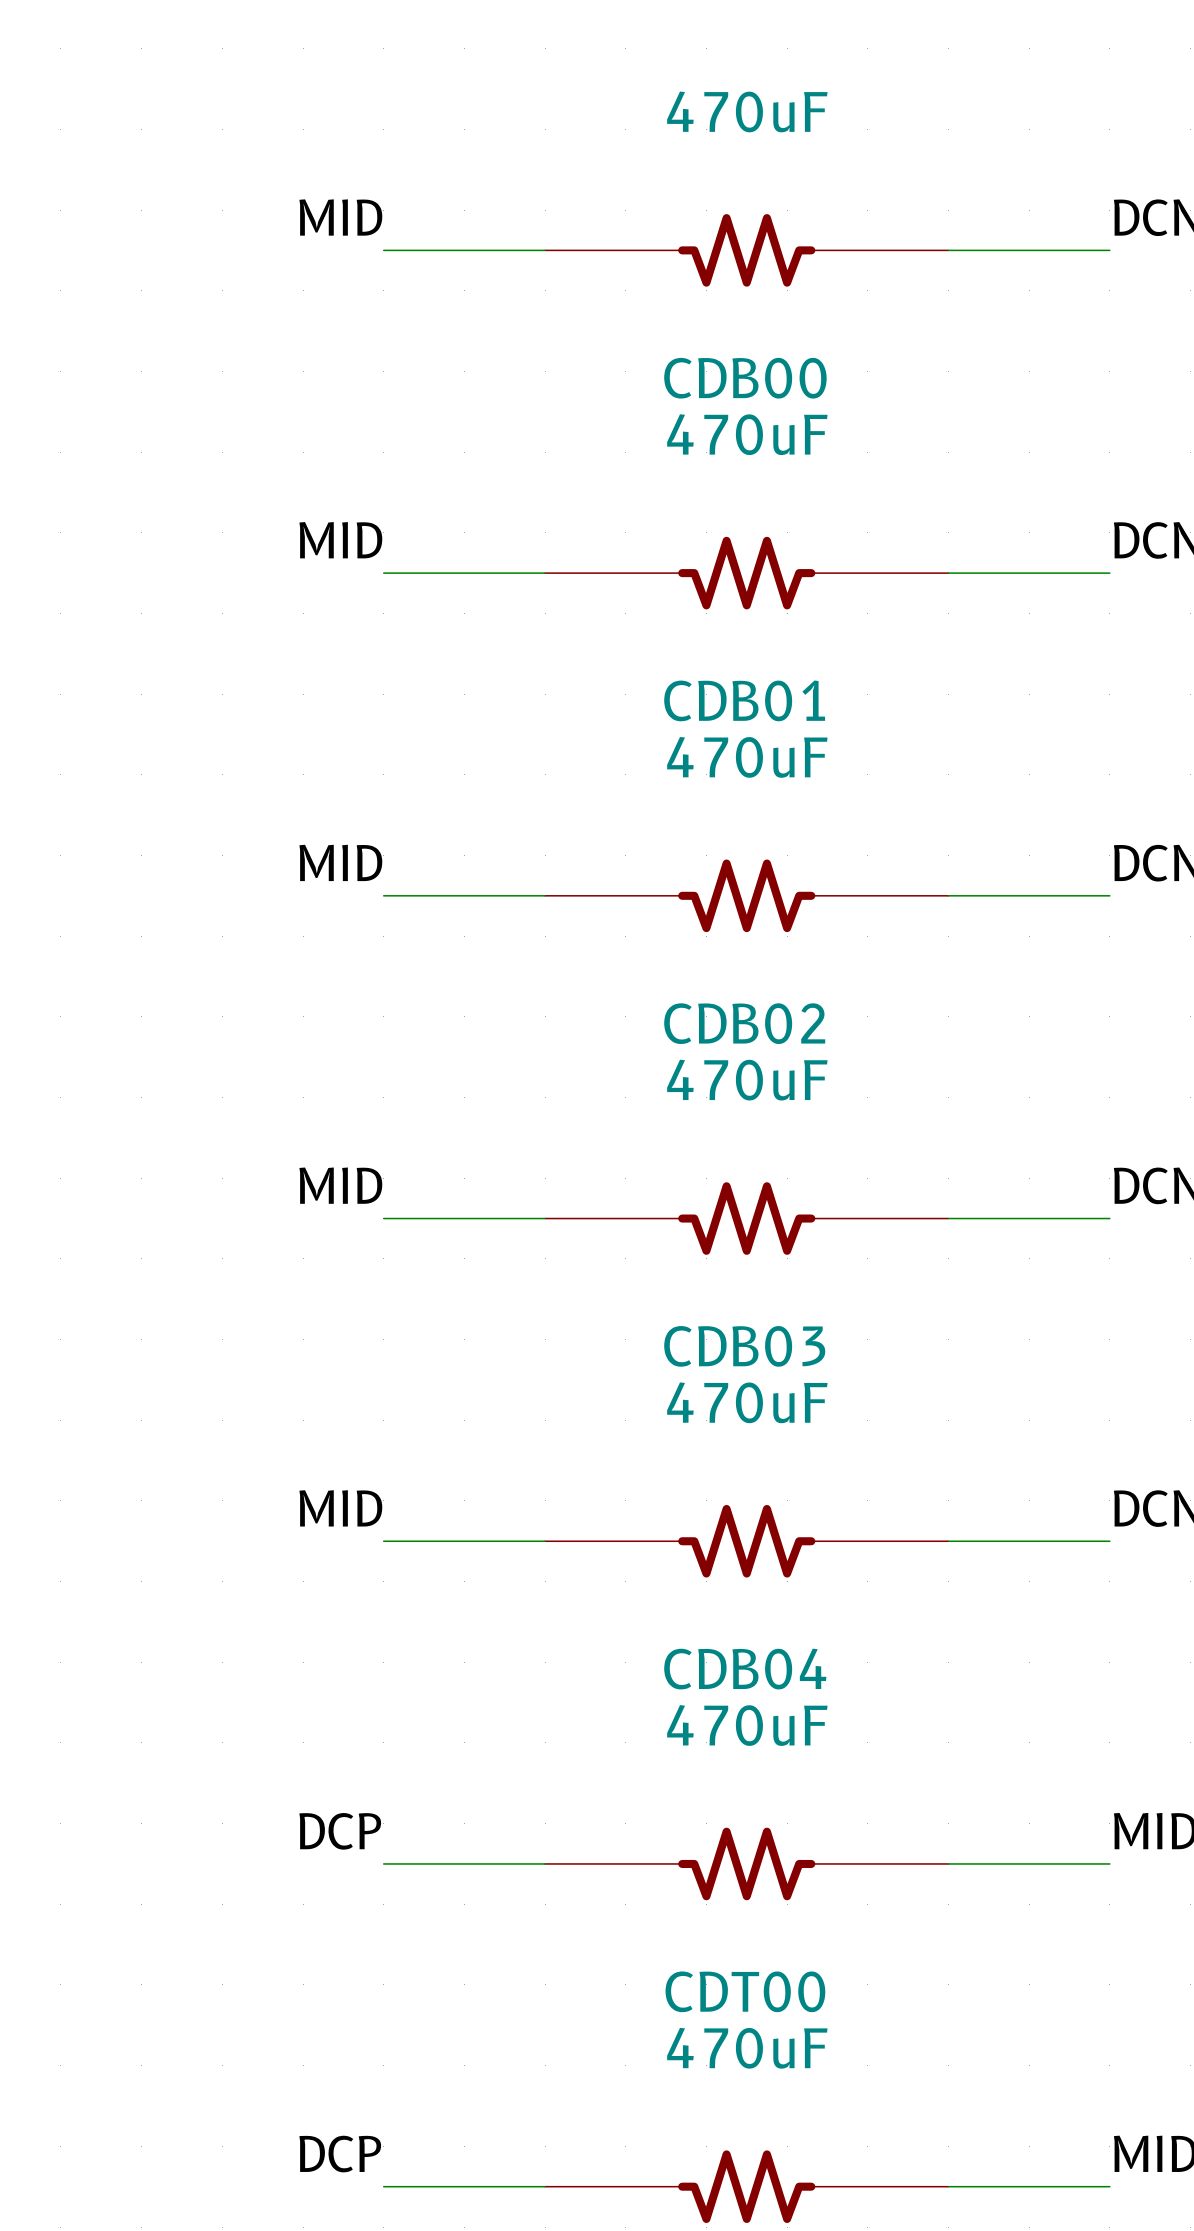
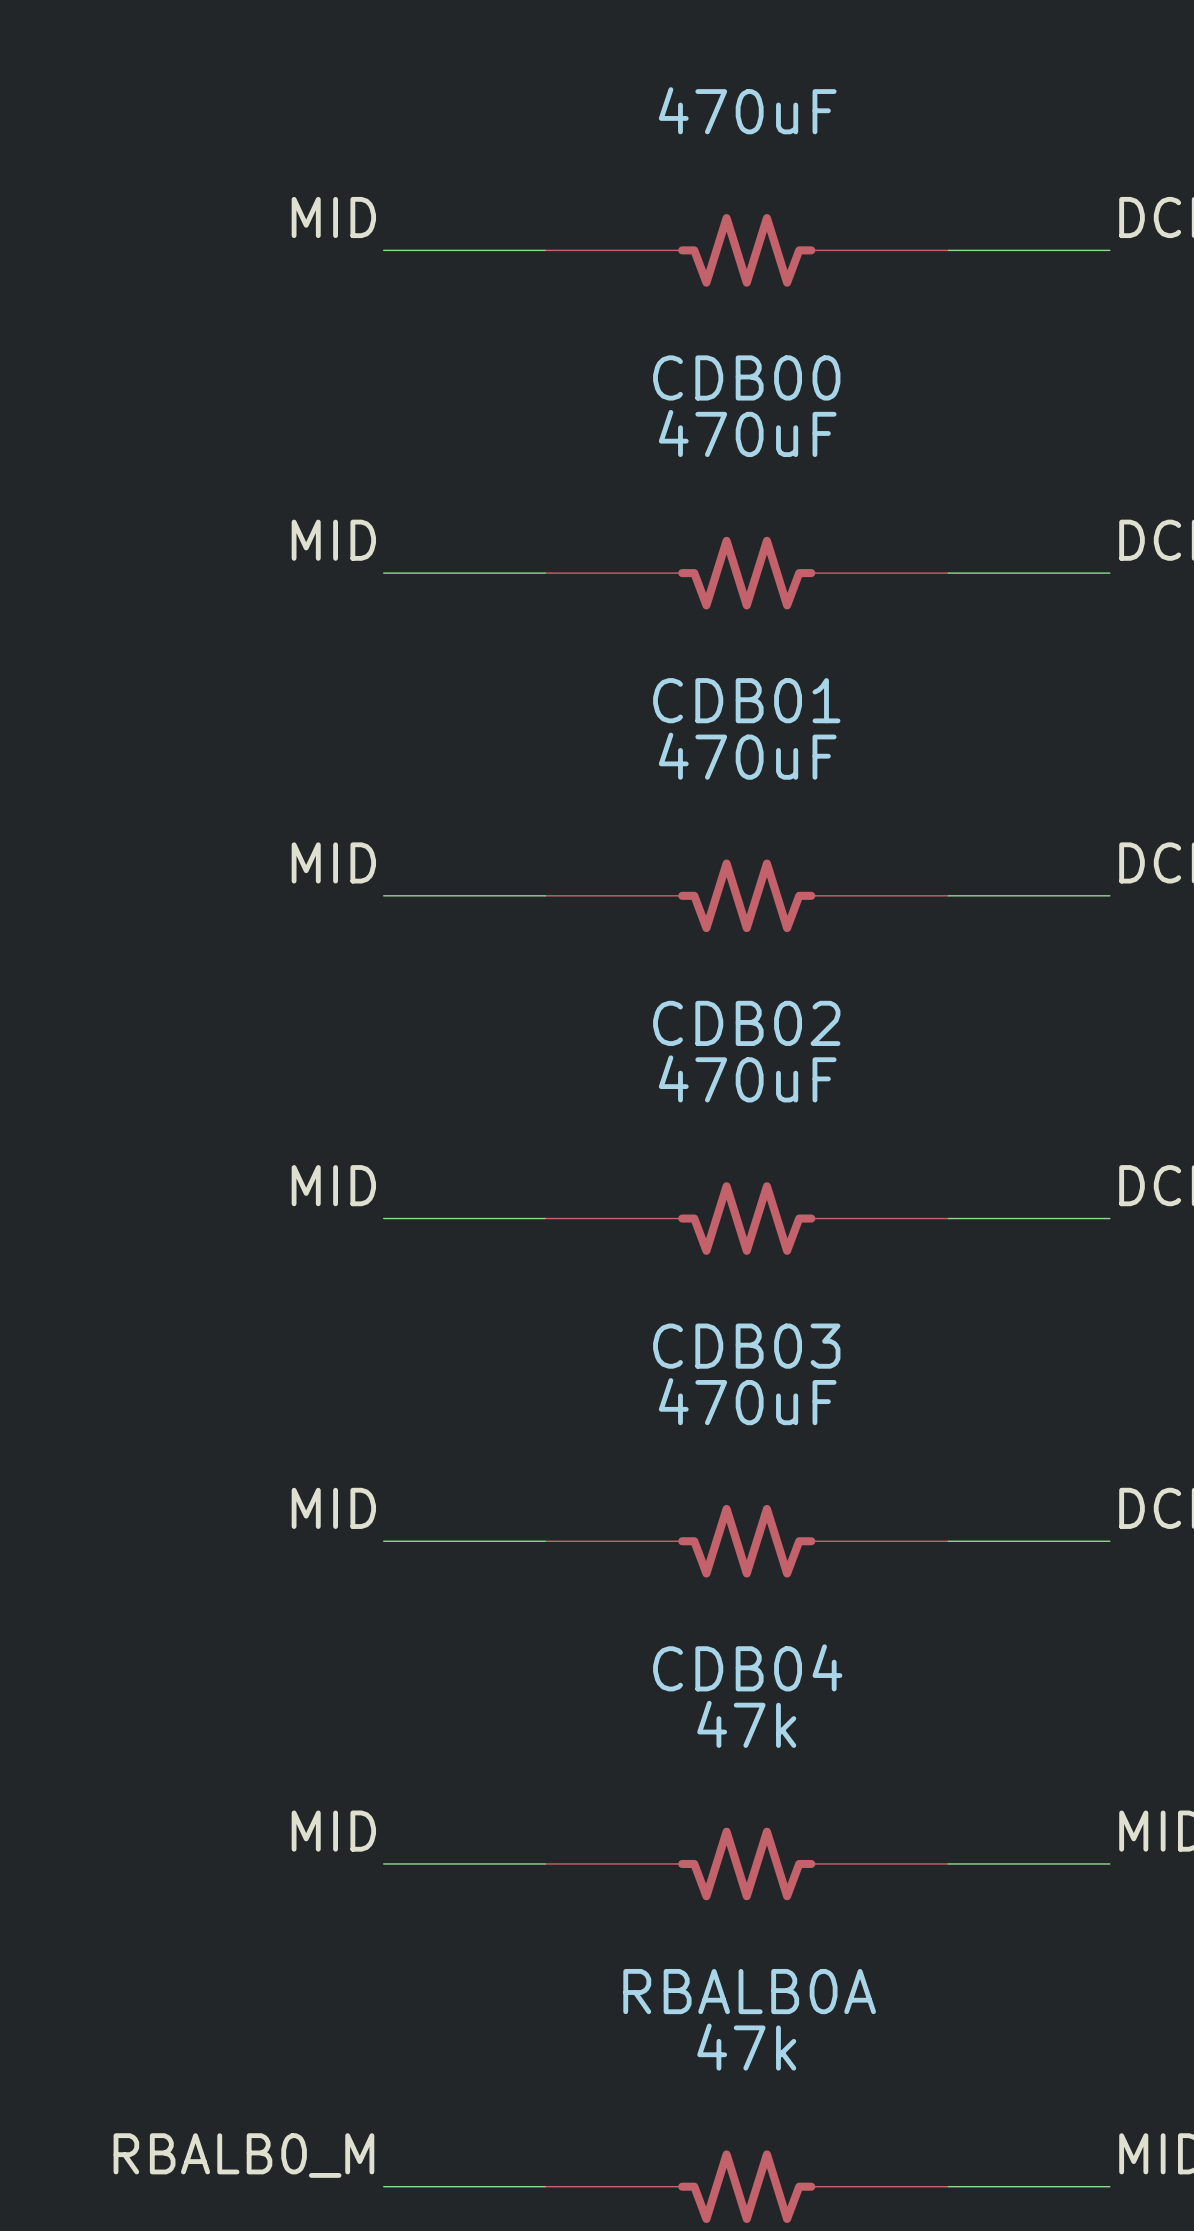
CDT00 value: 470uF (747, 1725) -> 47k (746, 1724)
label: DCP (340, 1831) -> MID (333, 1831)
CDT00 name: CDT00 (745, 1991) -> RBALB0A (749, 1991)
part value: 470uF (747, 2048) -> 47k (746, 2047)
label: DCP (340, 2154) -> RBALB0_M (243, 2155)

